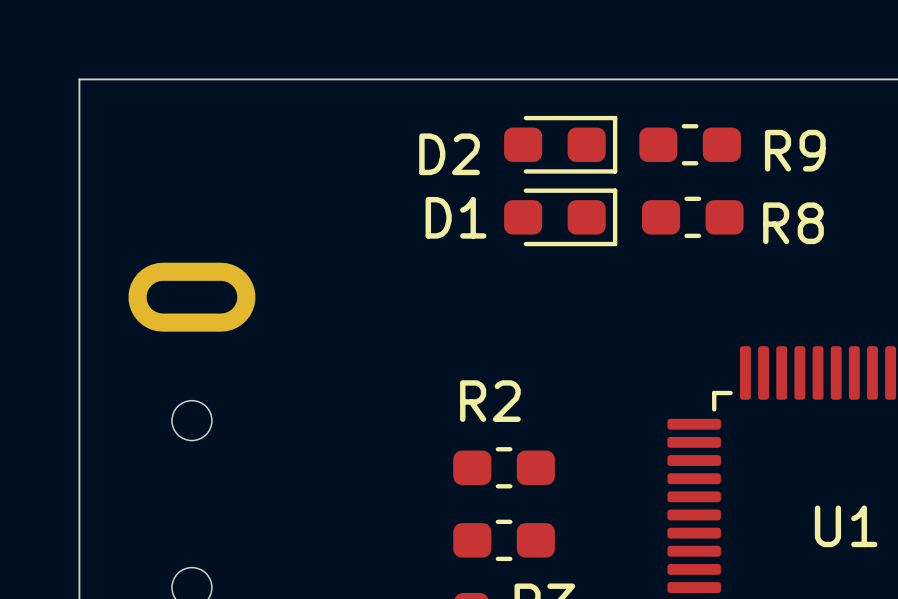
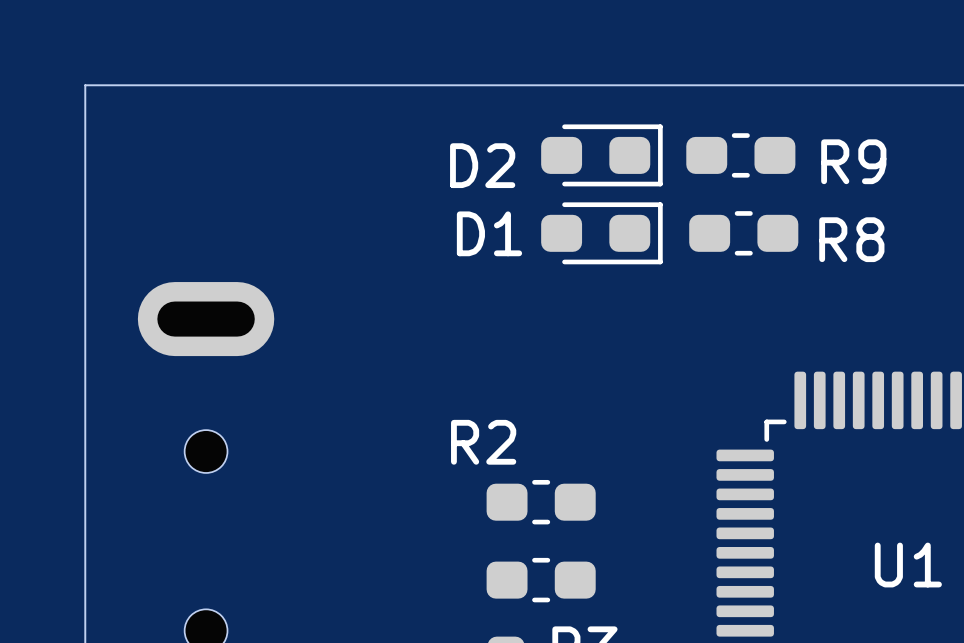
R2 name position: R2 (490, 401) -> R2 (483, 442)

